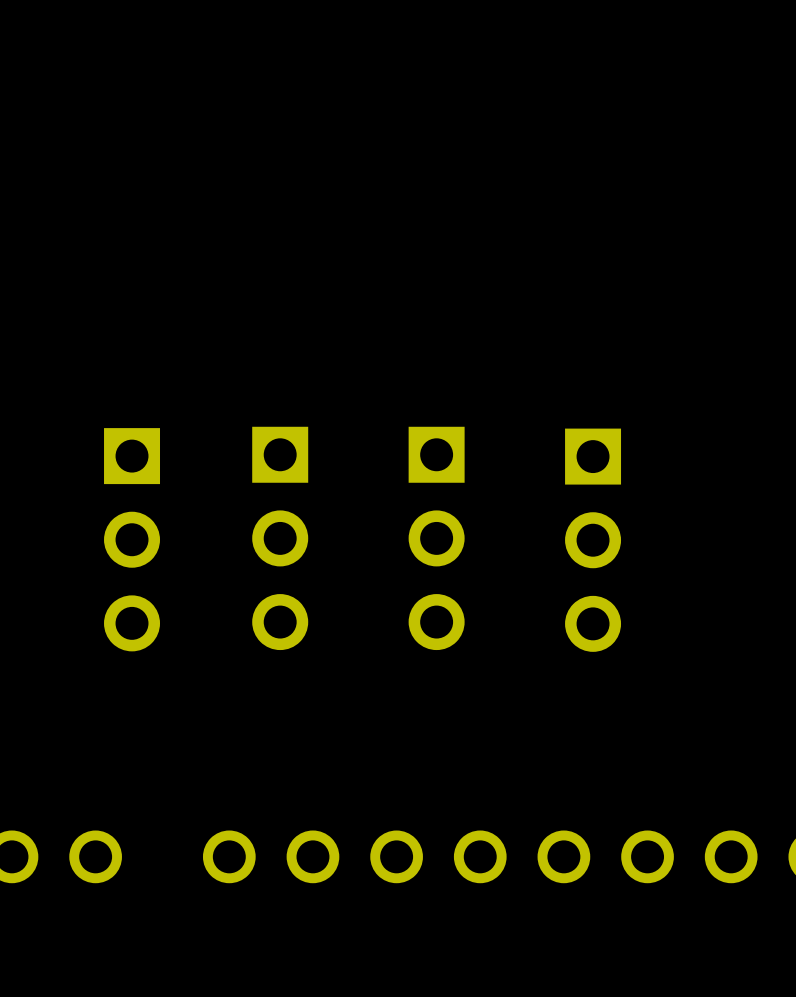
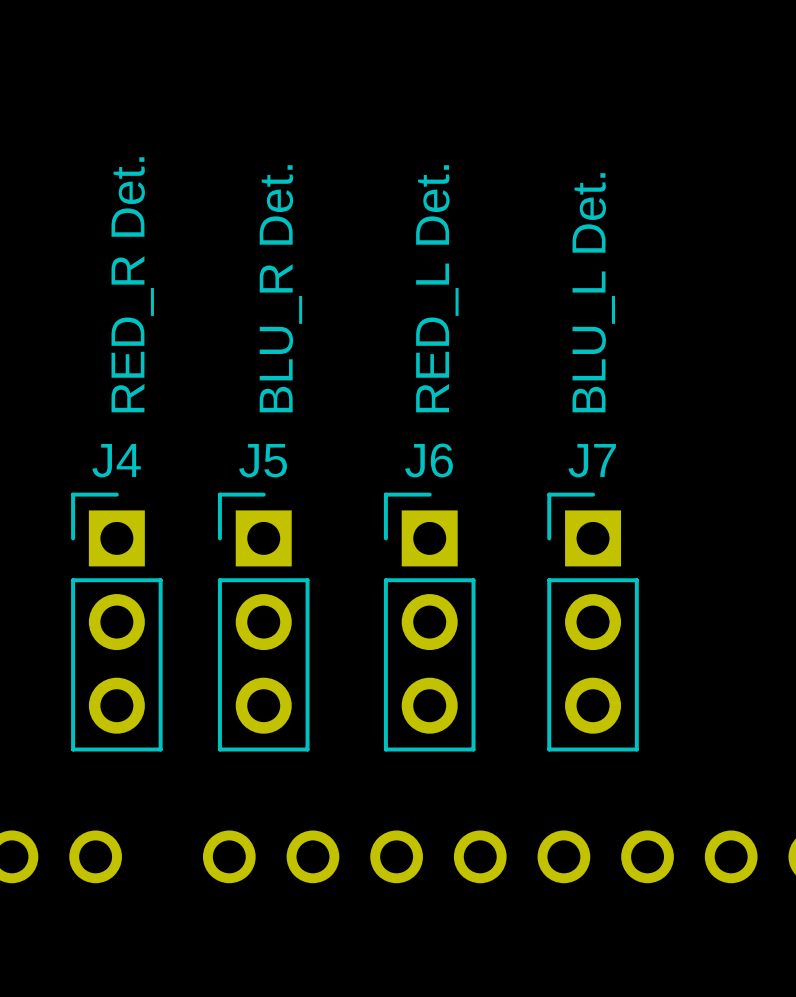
text: none -> RED_R Det. (132, 284)
text: none -> BLU_R Det. (280, 288)
text: none -> RED_L Det. (437, 288)
text: none -> BLU_L Det. (593, 292)
J5 side: bottom (280, 538) -> top (263, 622)
J6 side: bottom (436, 538) -> top (429, 622)
J4 side: bottom (132, 539) -> top (116, 622)
J7 side: bottom (593, 540) -> top (593, 622)

